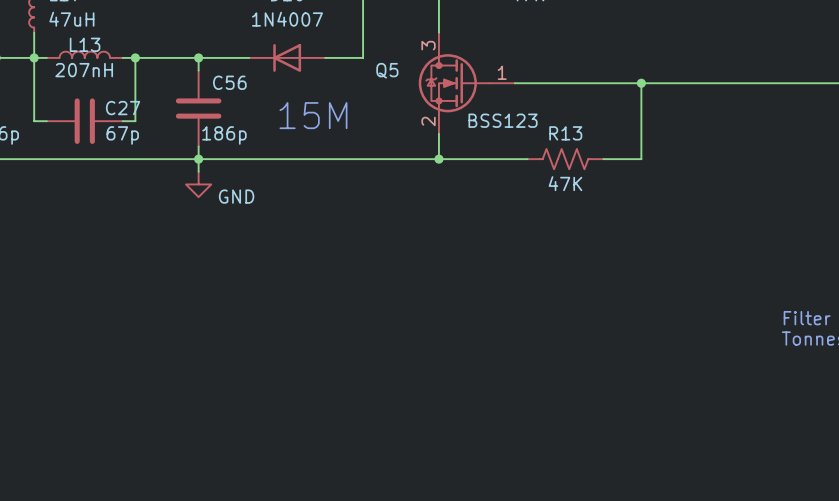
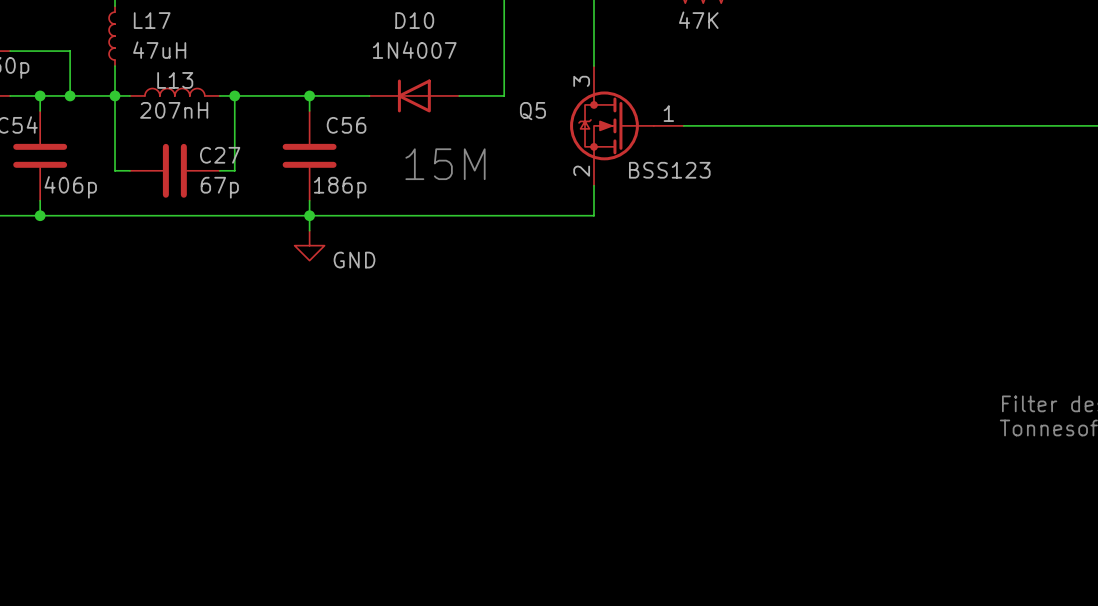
wire: (641, 83) (641, 159) (603, 159) -> none
junction: (641, 83) -> none
wire: (438, 159) (527, 159) -> none
junction: (438, 159) -> none
R13: 47K (565, 159) -> none

